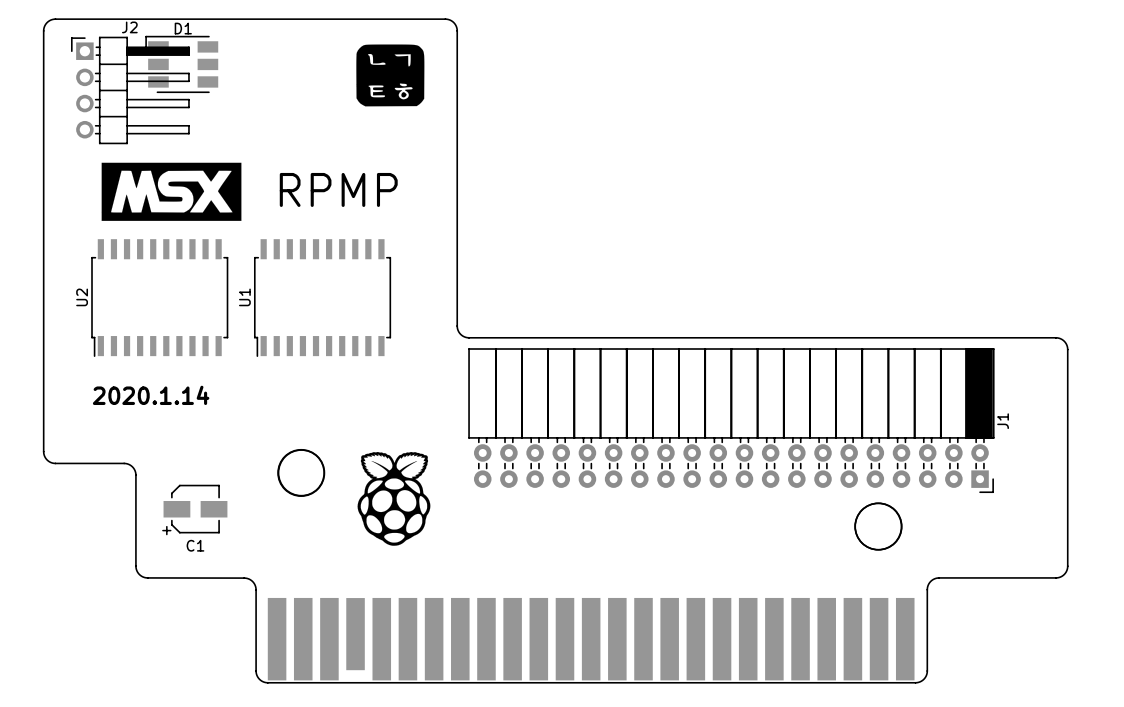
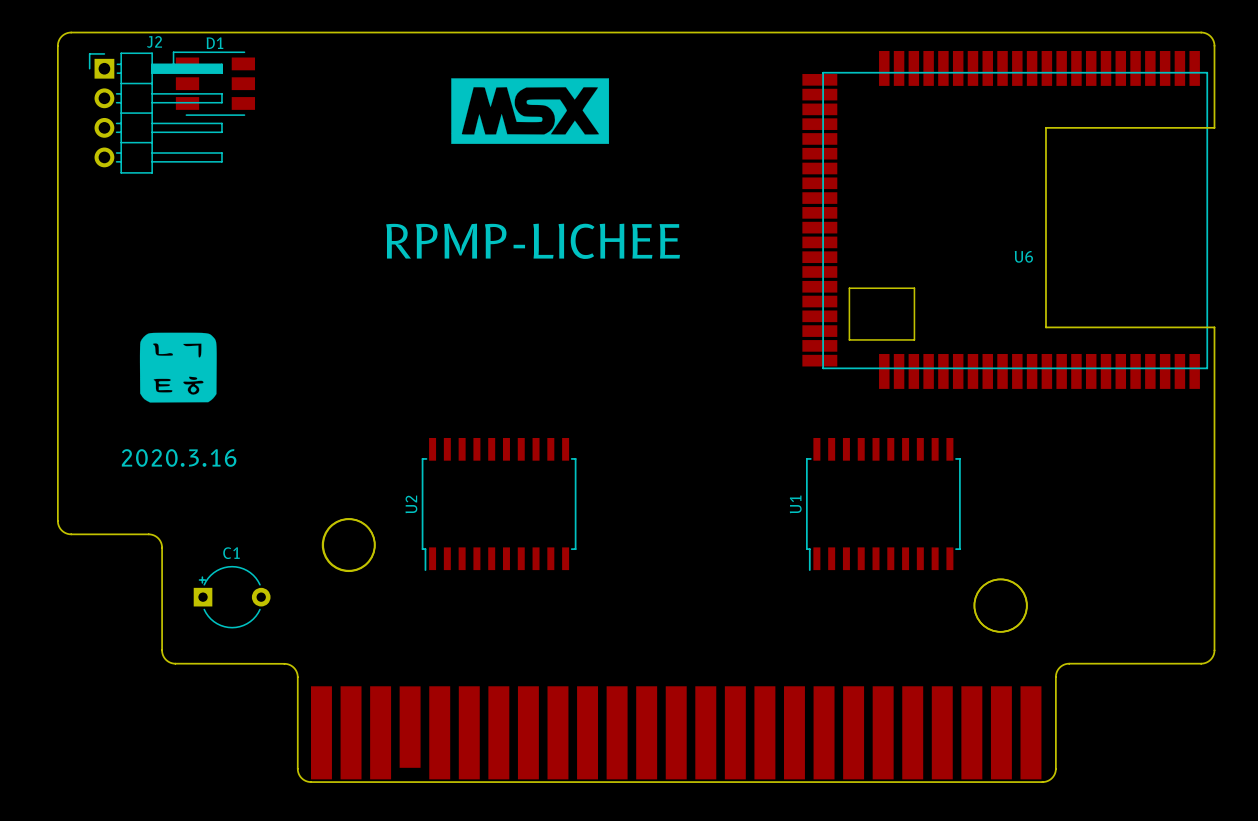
board edge: (445, 19) (453, 22) (457, 30) (457, 326) (458, 331) (463, 336) (469, 337) (1055, 337) (1064, 341) (1067, 349) -> (511, 32) (1201, 32)
board edge: none -> (1201, 32) (1209, 35) (1214, 44) (1214, 127) (1045, 127) (1045, 327) (1214, 327) (1214, 405)
drawing: [356, 44, 425, 107] -> none
drawing: none -> [451, 78, 610, 144]
drawing: [101, 162, 242, 221] -> none
U6: none -> (1005, 219)
text: RPMP (338, 189) -> none
text: none -> RPMP-LICHEE (533, 241)
board edge: none -> (849, 288) (914, 288) (914, 339) (849, 339) (849, 288)
drawing: none -> [139, 332, 217, 403]
U2 position: (159, 298) -> (499, 504)
U1 position: (322, 298) -> (883, 504)
text: 2020.1.14 (151, 395) -> 2020.3.16 (179, 457)
J1: (731, 420) -> none
drawing: [357, 452, 431, 546] -> none
C1 footprint: [163, 484, 228, 534] -> [193, 565, 271, 629]
C1 name position: C1 (195, 545) -> C1 (231, 553)

